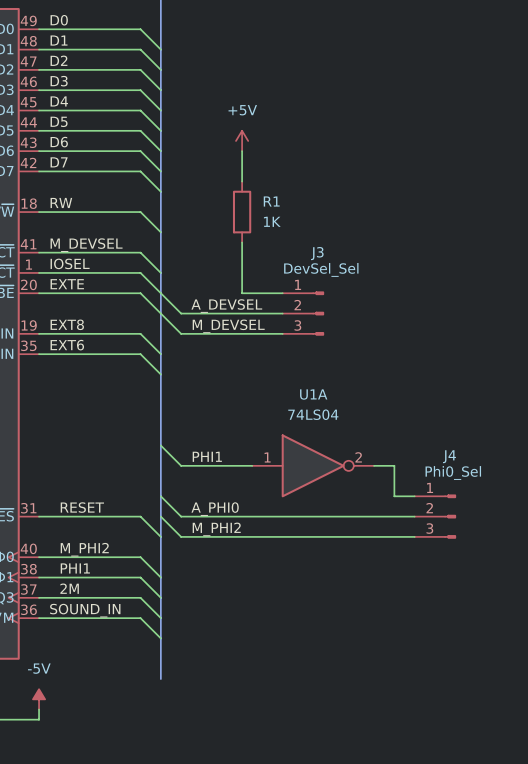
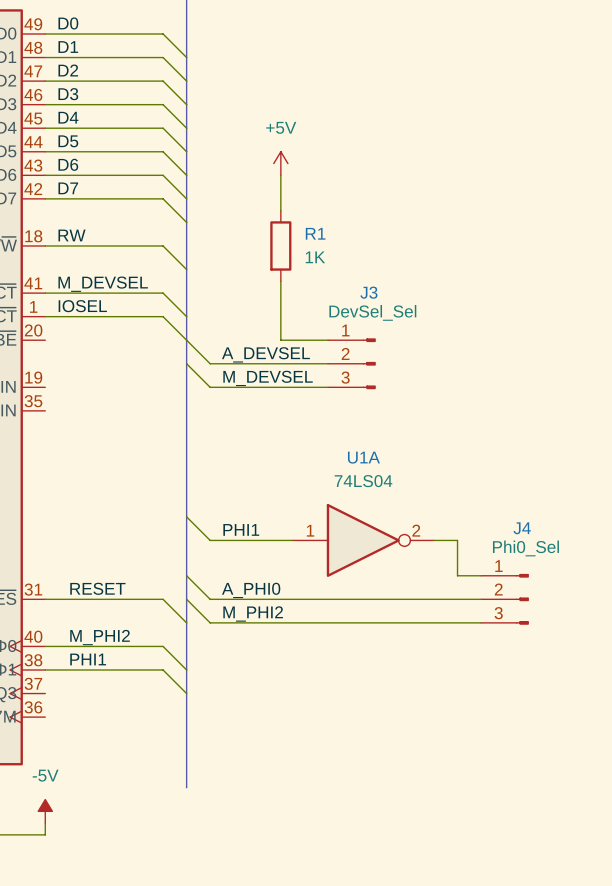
label: EXTE (67, 284) -> none
wire: (39, 293) (140, 293) (160, 313) -> none
label: EXT8 (67, 324) -> none
wire: (39, 333) (140, 333) (160, 354) -> none
label: EXT6 (67, 345) -> none
wire: (39, 354) (140, 354) (160, 374) -> none
label: 2M (69, 588) -> none
wire: (39, 597) (140, 597) (160, 618) -> none
label: SOUND_IN (85, 610) -> none
wire: (39, 618) (140, 618) (160, 638) -> none

